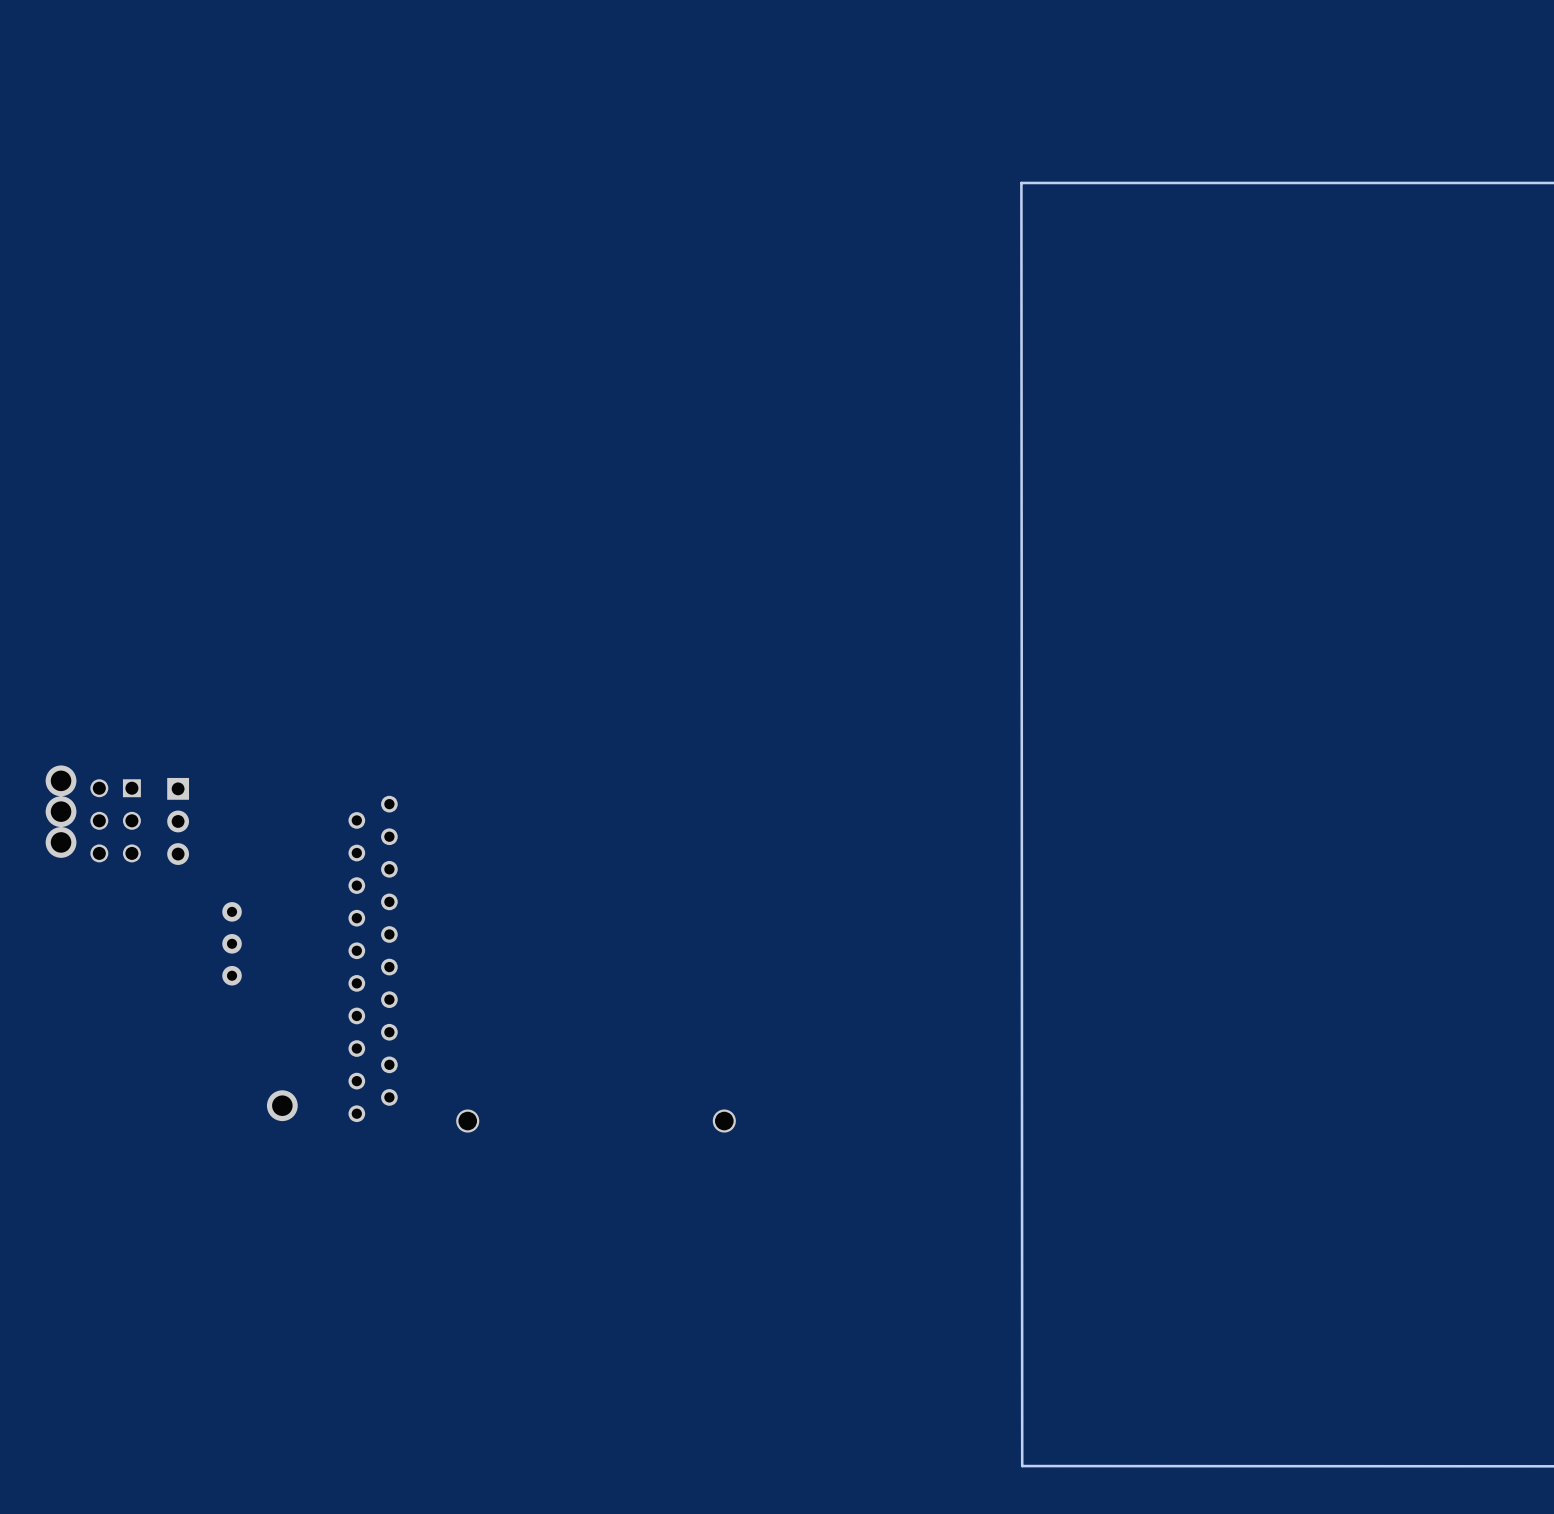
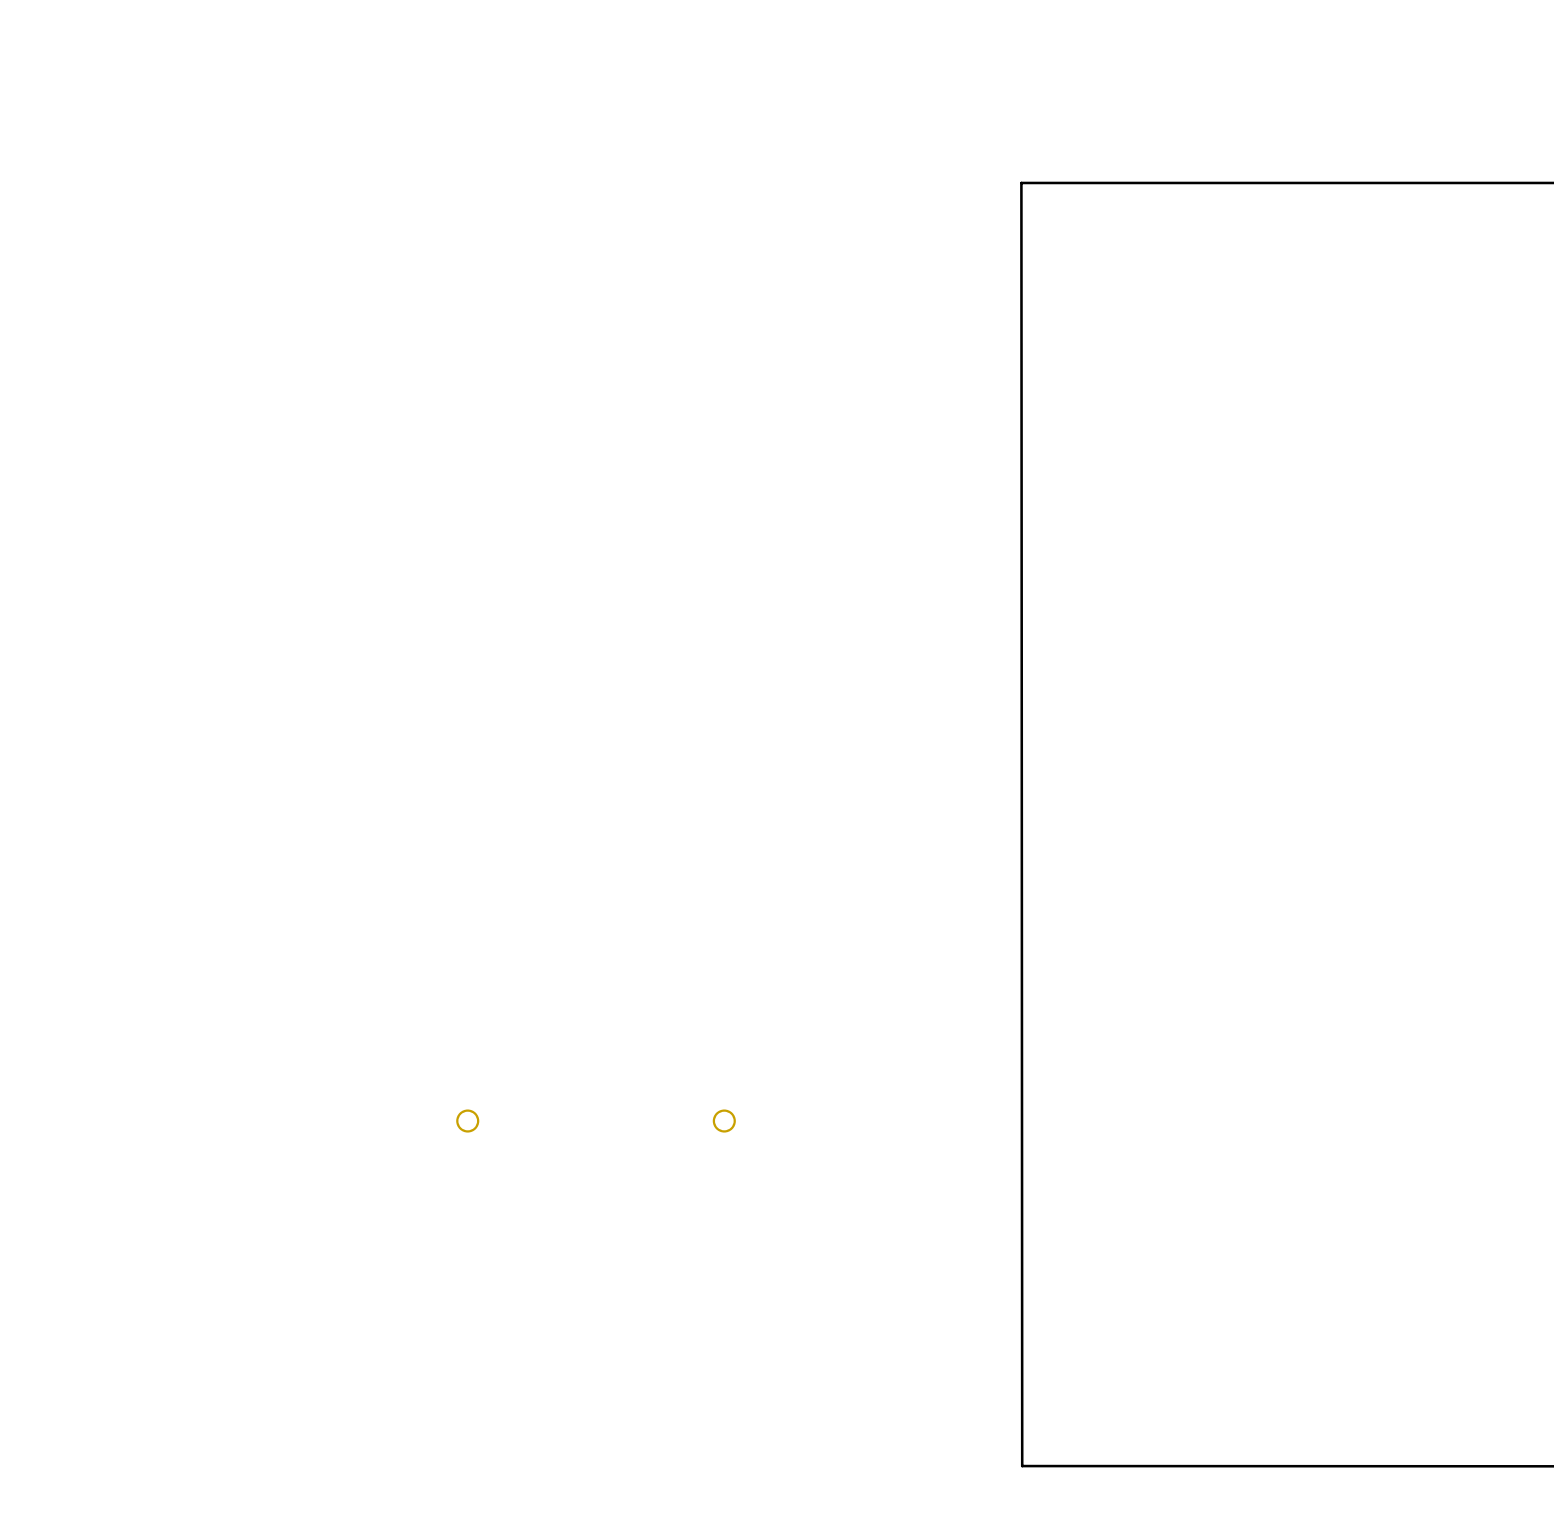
part: (61, 780) -> none
part: (61, 811) -> none
part: (115, 820) -> none
part: (178, 821) -> none
part: (61, 842) -> none
part: (232, 943) -> none
part: (373, 958) -> none
part: (282, 1105) -> none

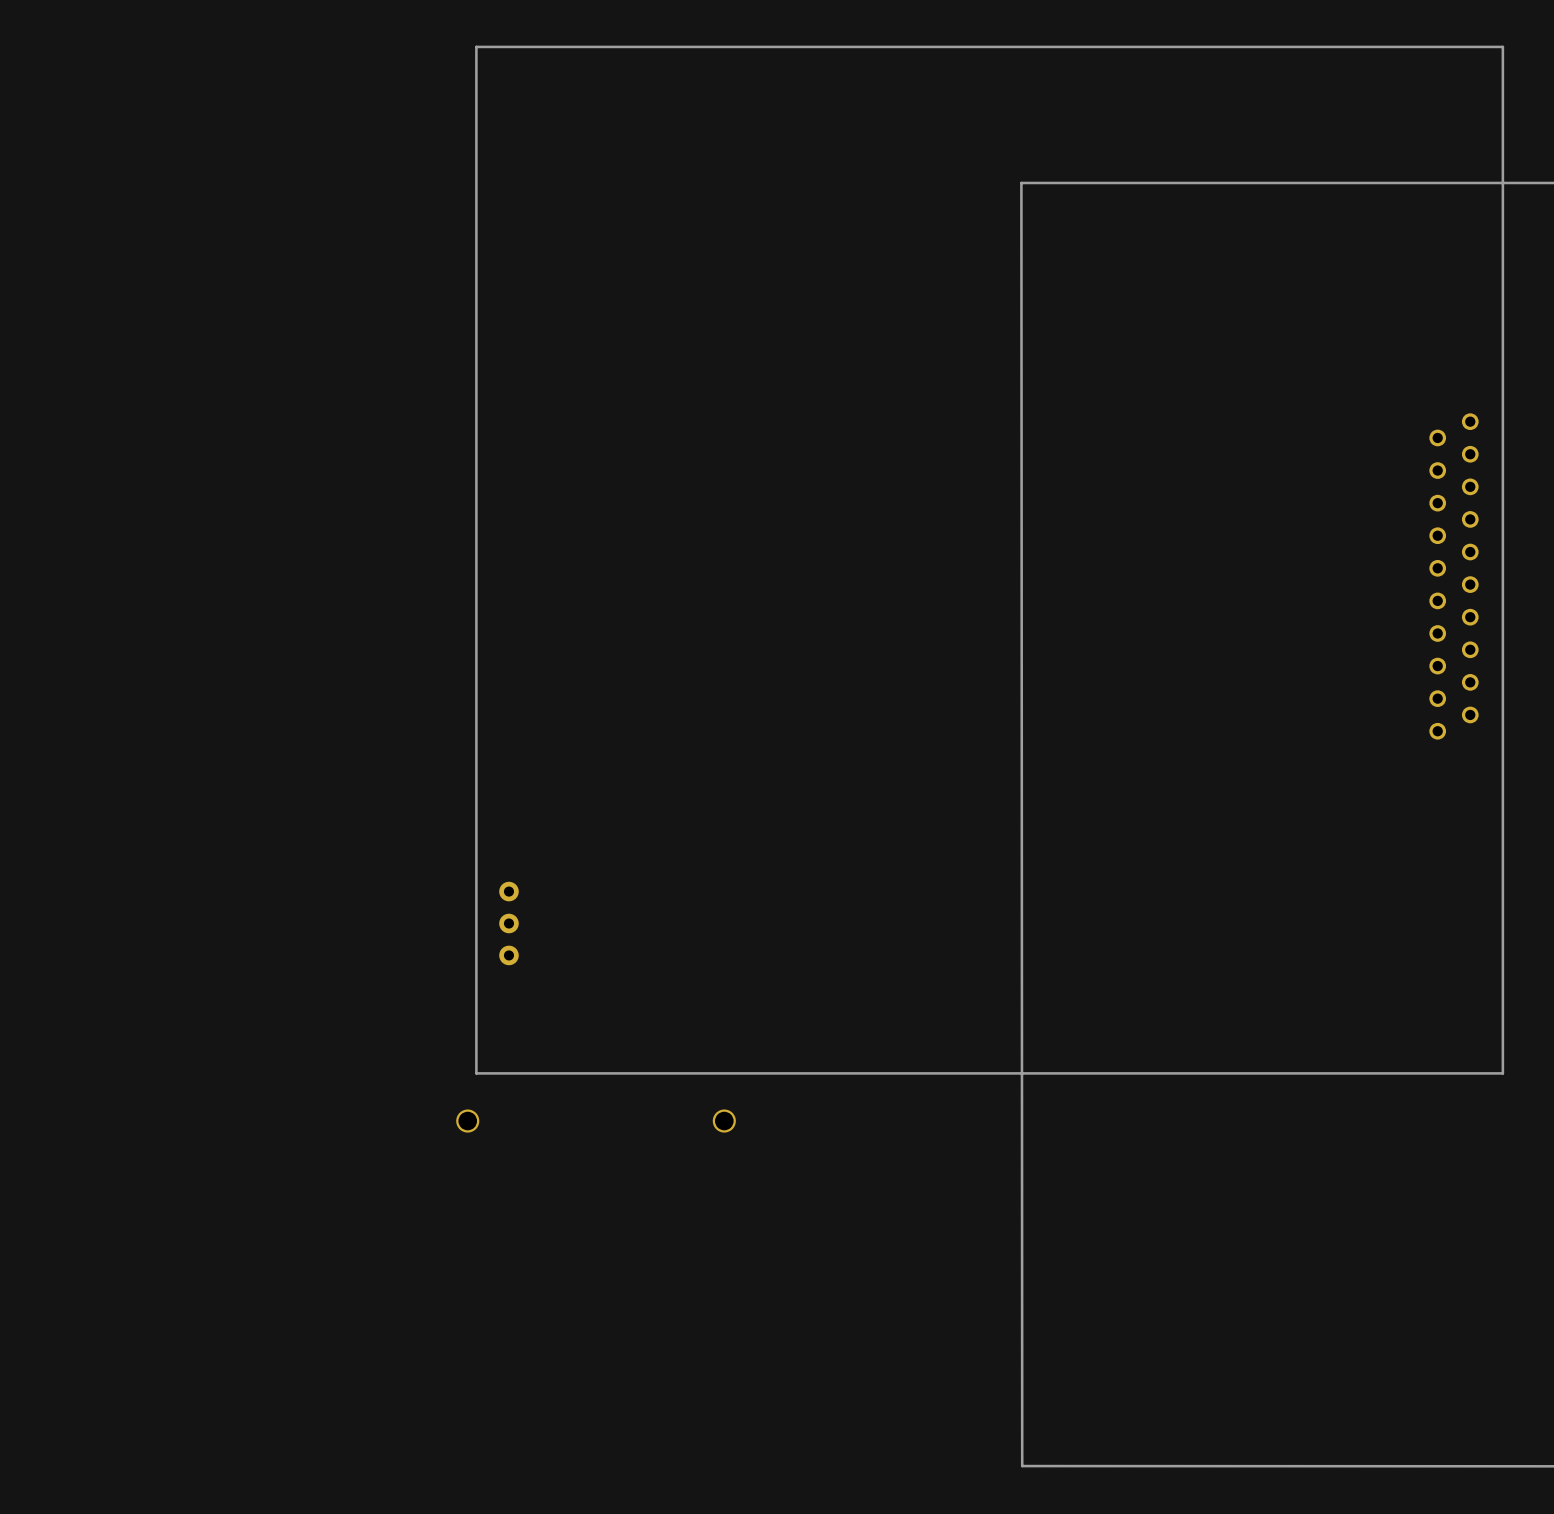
board edge: none -> (1502, 46) (476, 46) (476, 1073) (1502, 1073) (1502, 46)
part: none -> (1453, 576)
part: none -> (508, 923)

